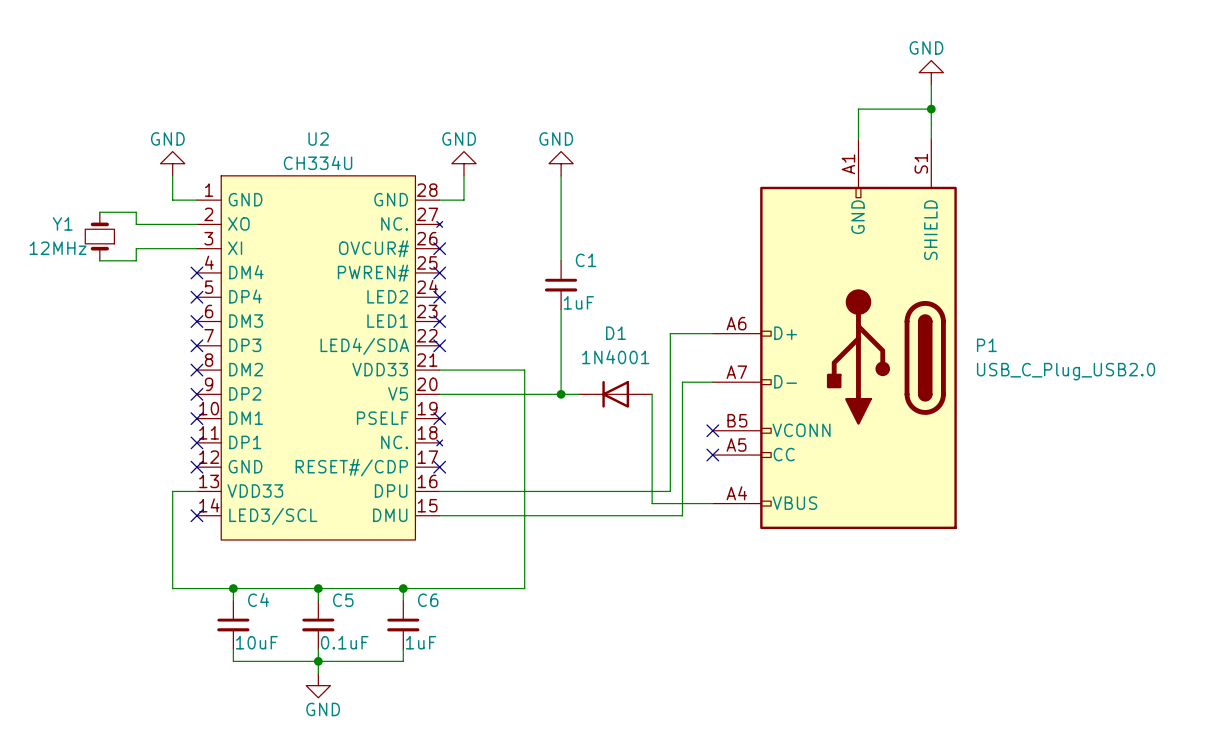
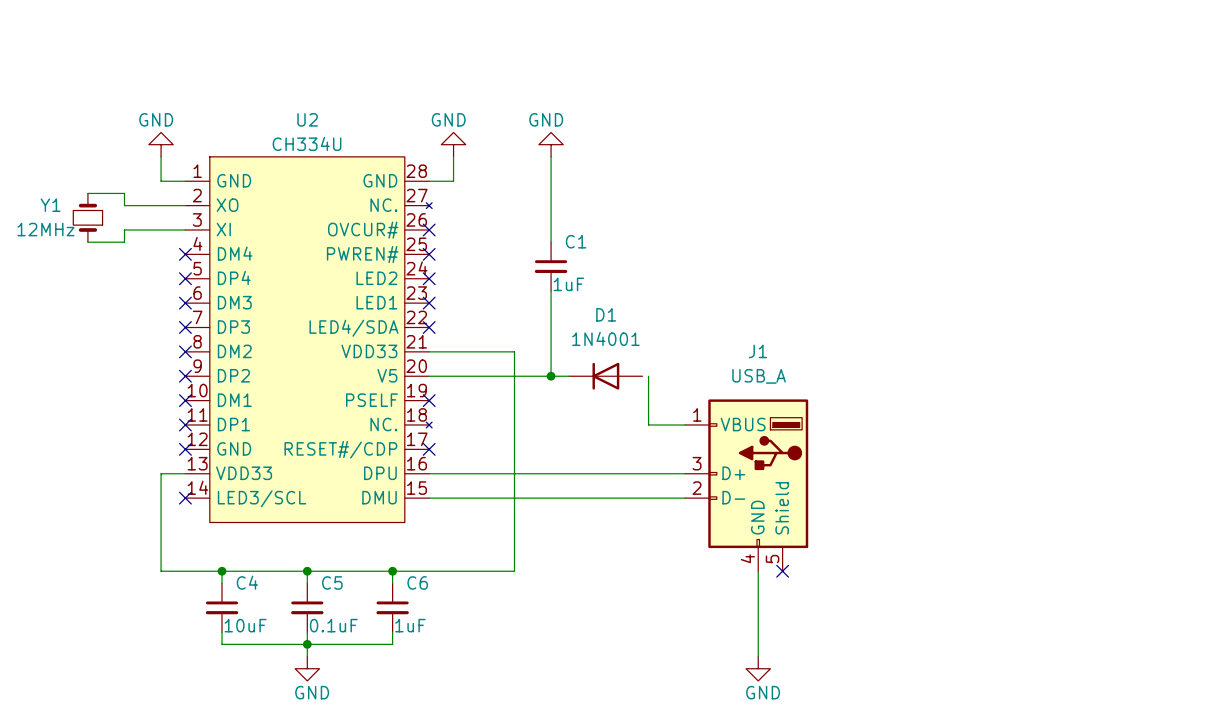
power symbol: GND (931, 72) -> none
wire: (931, 84) (931, 139) -> none
wire: (931, 109) (858, 109) (858, 139) -> none
junction: (931, 109) -> none
wire: (712, 333) (670, 333) (670, 491) -> (685, 473) (660, 473)
P1: USB_C_Plug_USB2.0 (834, 334) -> none
wire: (712, 382) (682, 382) (682, 515) -> (685, 498) (672, 498)
wire: (652, 394) (652, 503) (712, 503) -> none
wire: none -> (648, 376) (648, 424) (685, 424)
no-connect mark: (712, 430) -> none
no-connect mark: (712, 455) -> none
J1: none -> USB_A (746, 485)
wire: none -> (758, 571) (758, 656)
no-connect mark: none -> (782, 571)
power symbol: none -> GND (758, 668)

